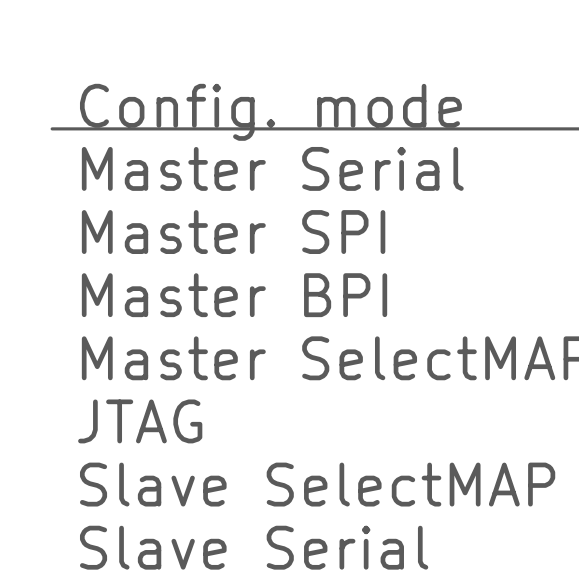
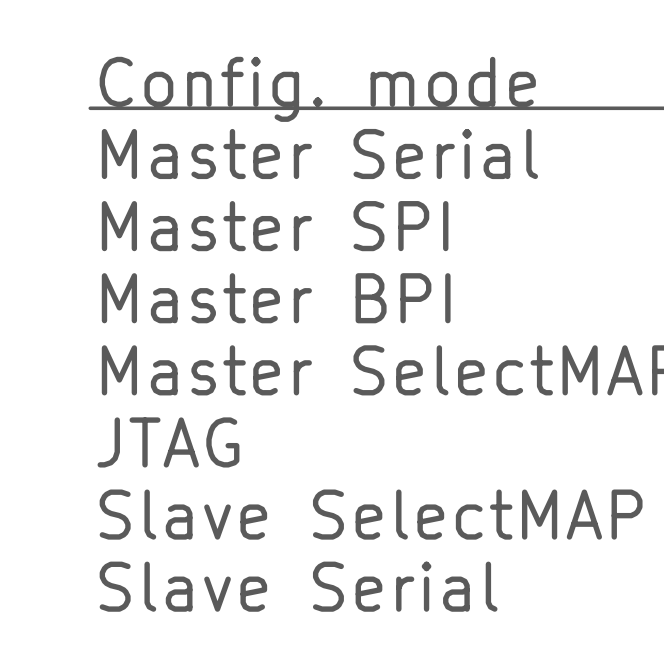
line: (52, 128) (71, 128) -> none

